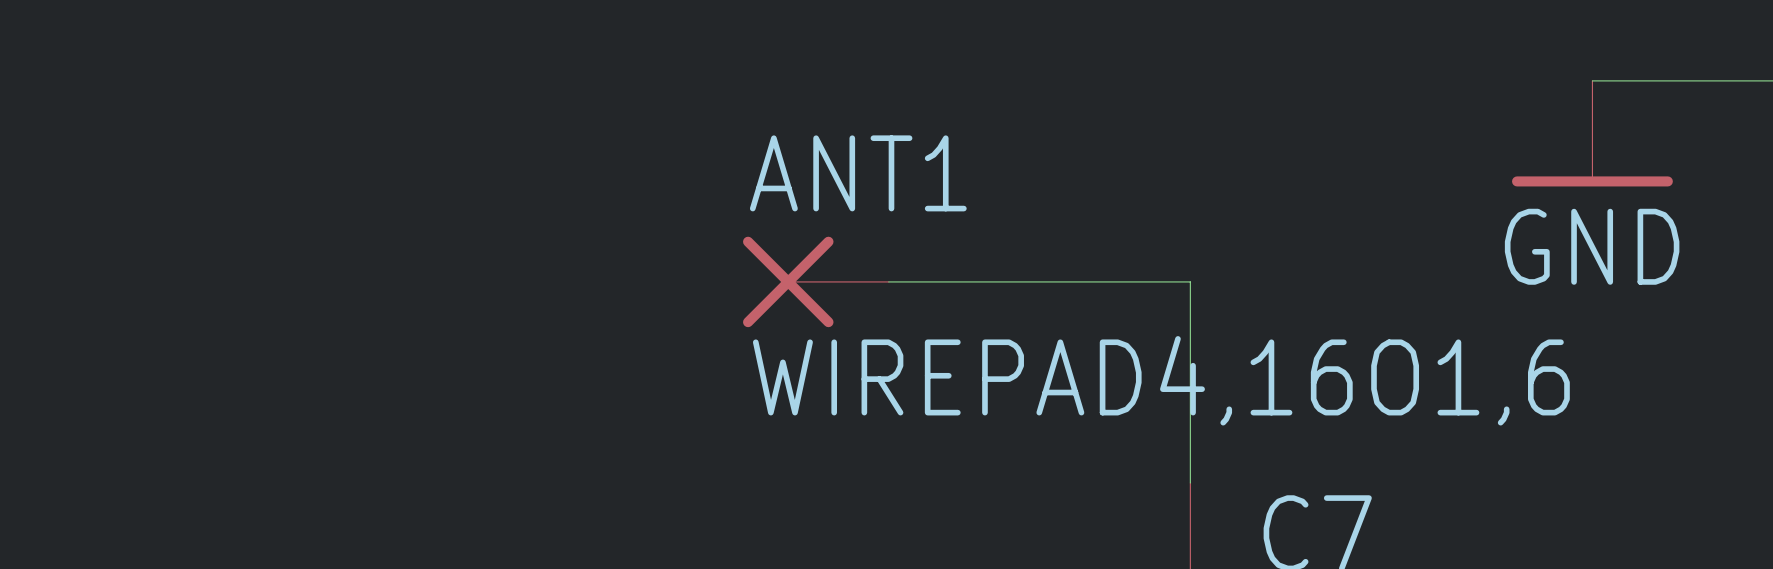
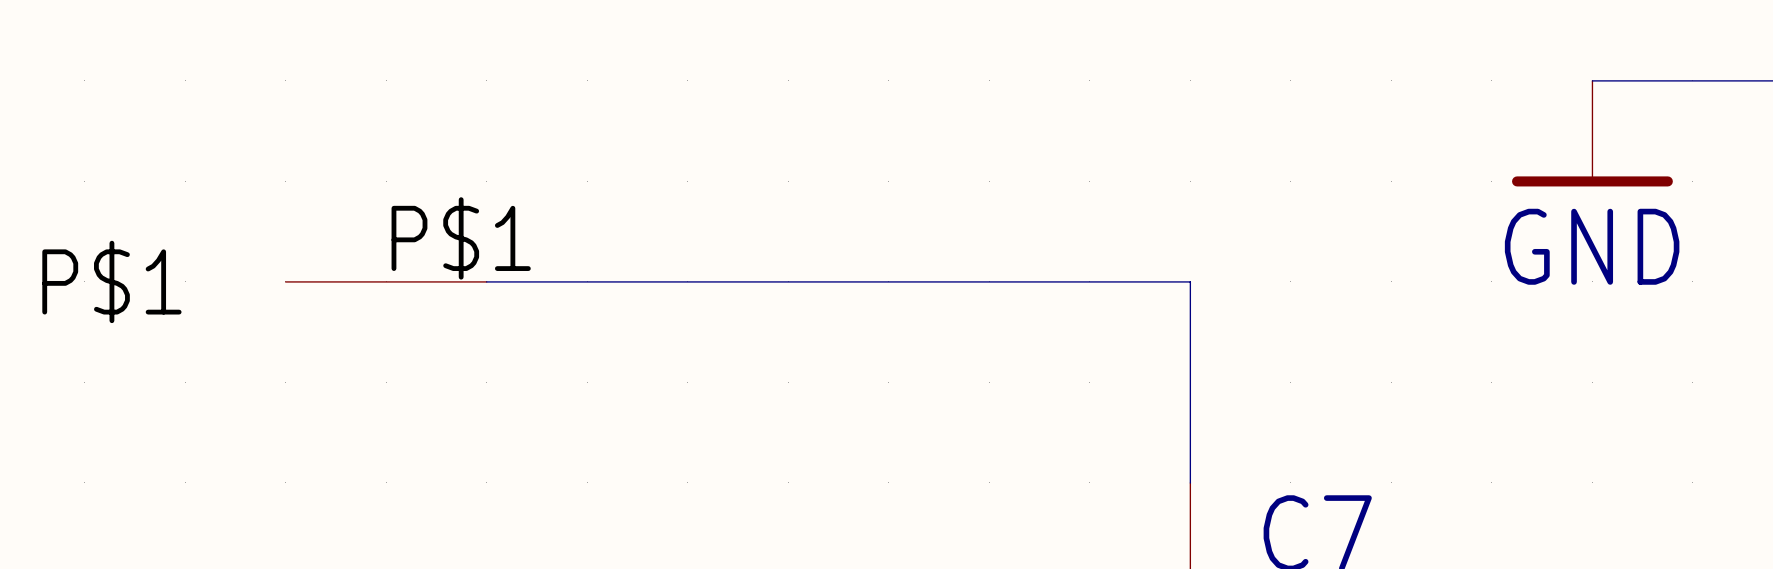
part: none -> (386, 281)
wire: none -> (486, 281) (888, 281)
ANT1: WIREPAD4,16O1,6 (815, 281) -> none

